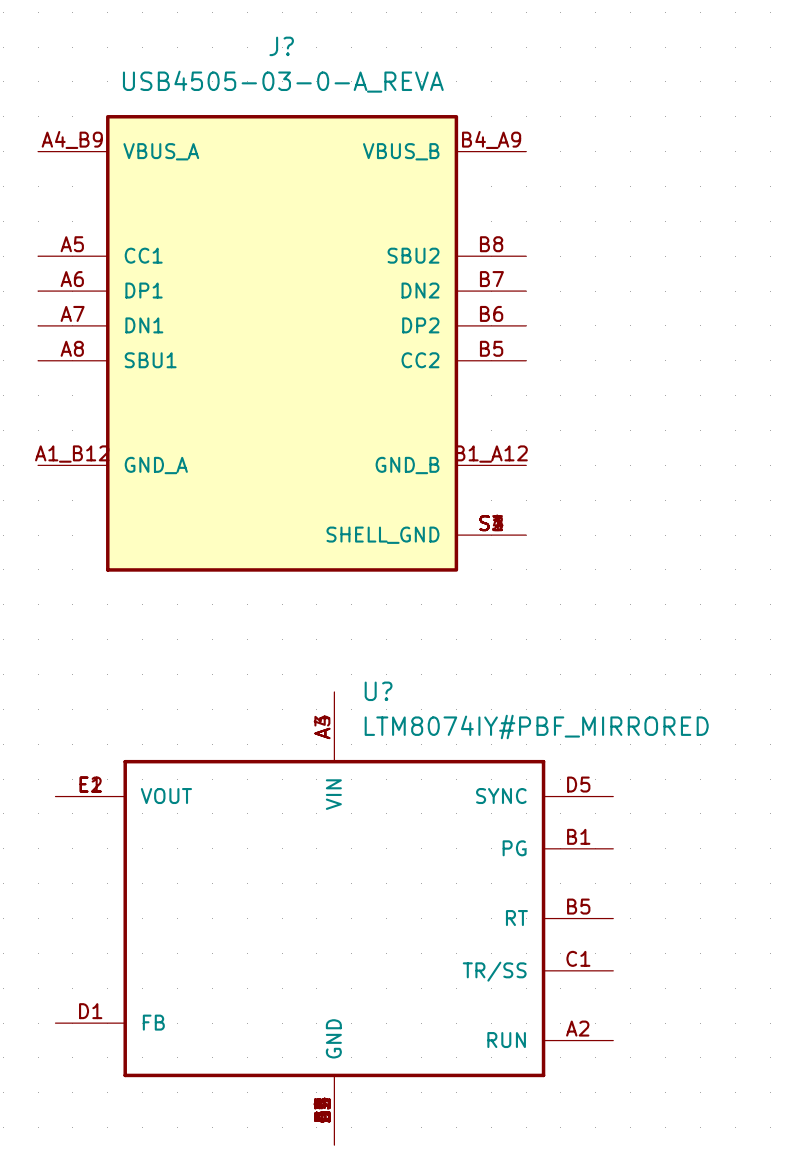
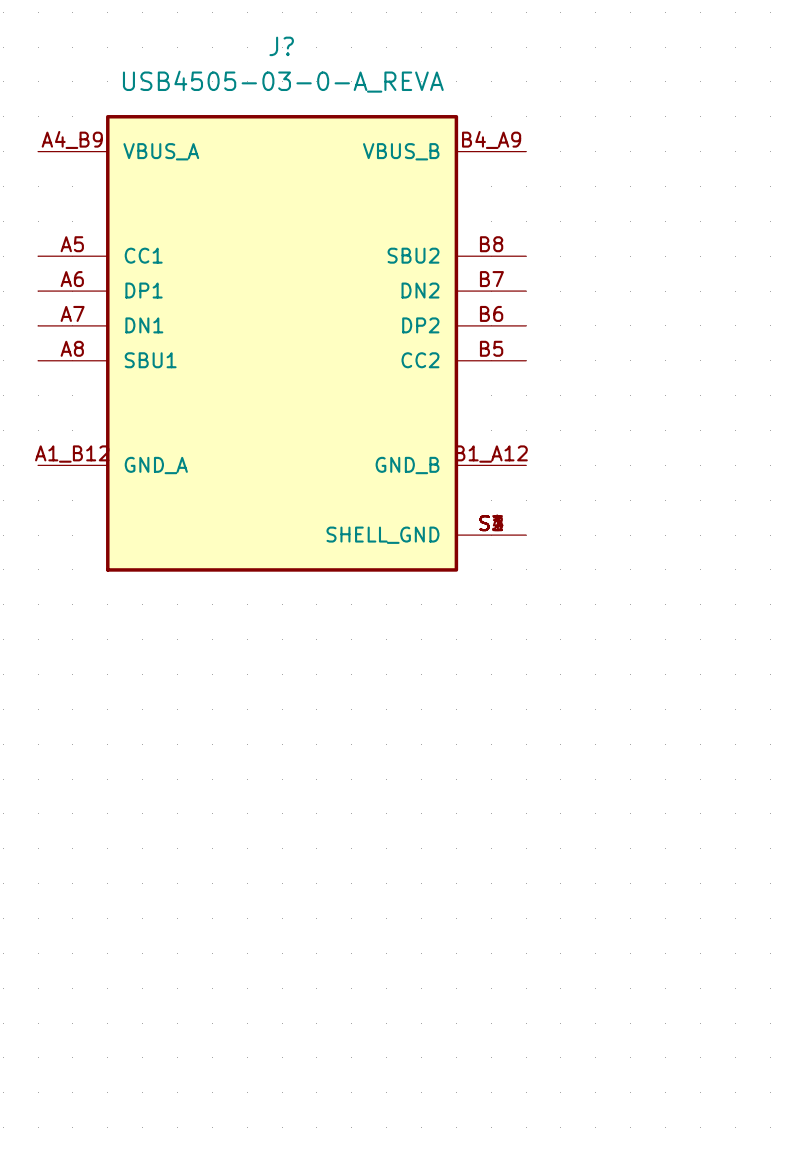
U?: LTM8074IY#PBF_MIRRORED (334, 918) -> none

